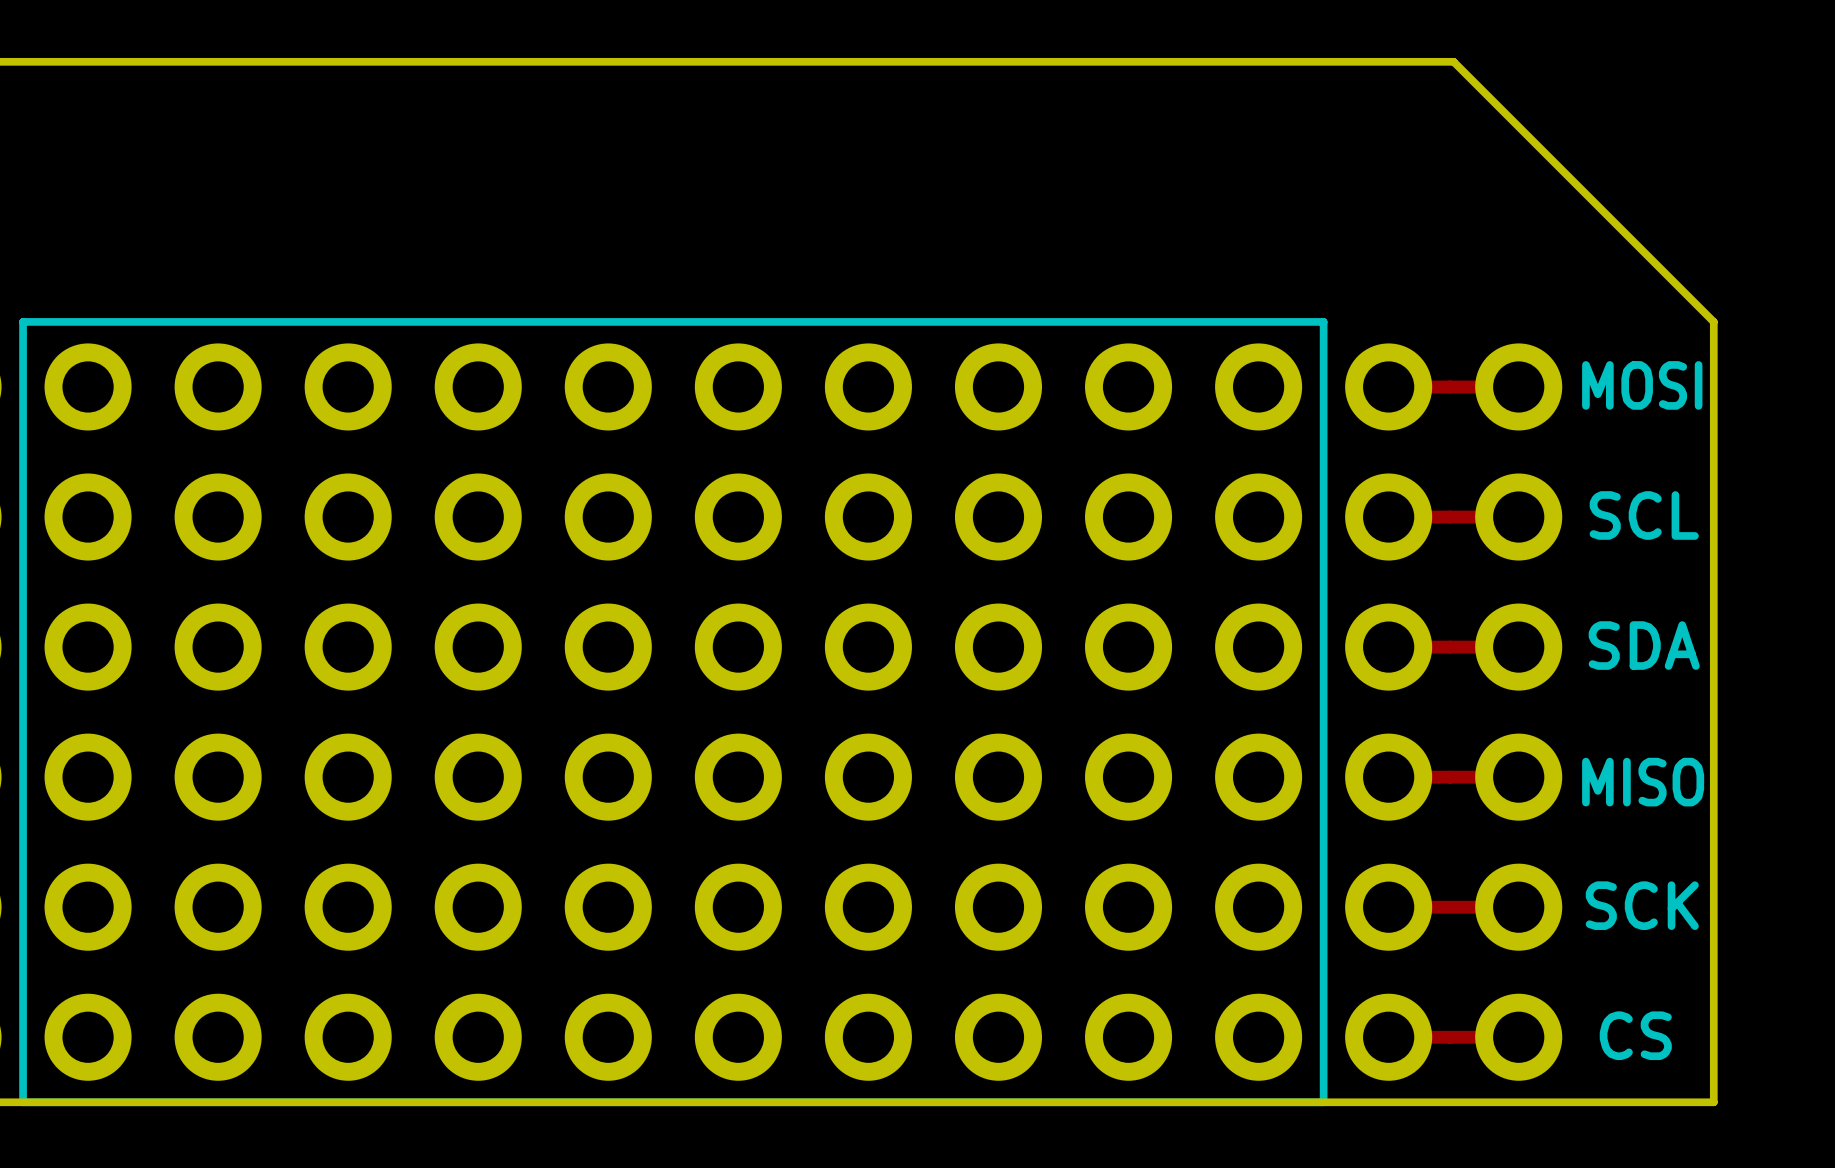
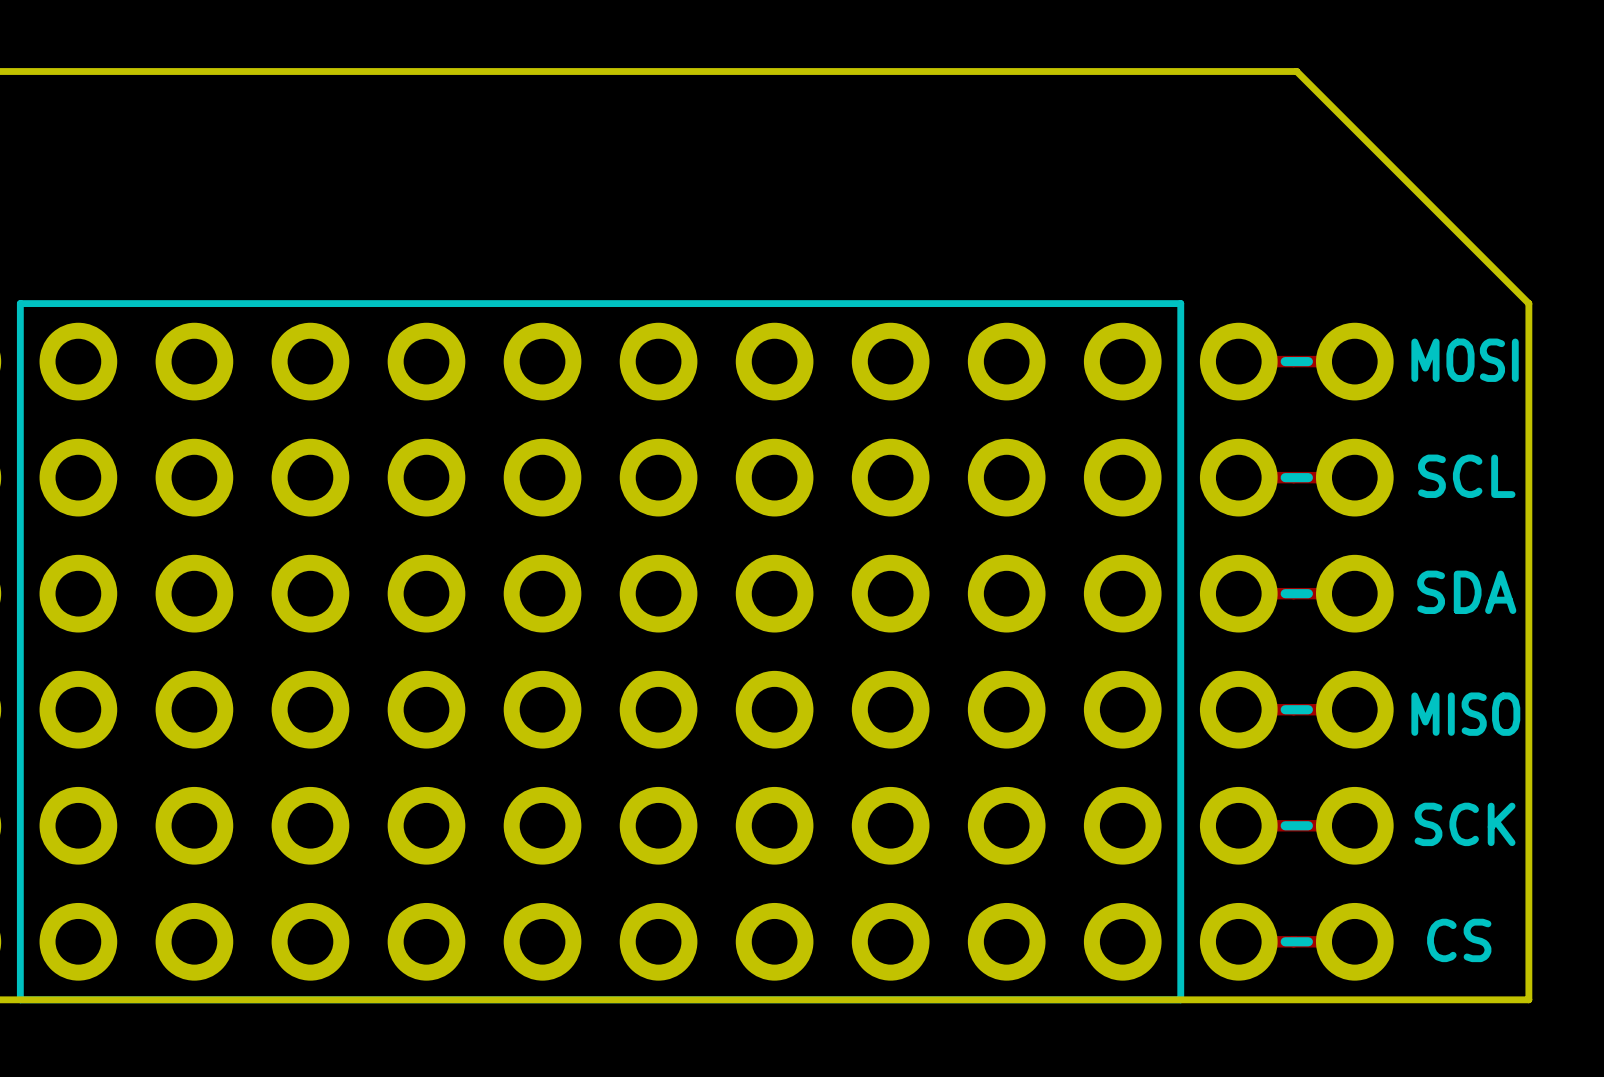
line: none -> (1285, 361) (1308, 361)
line: none -> (1285, 477) (1308, 477)
line: none -> (1285, 593) (1308, 593)
line: none -> (1285, 709) (1308, 709)
line: none -> (1285, 825) (1308, 825)
line: none -> (1285, 941) (1308, 941)

